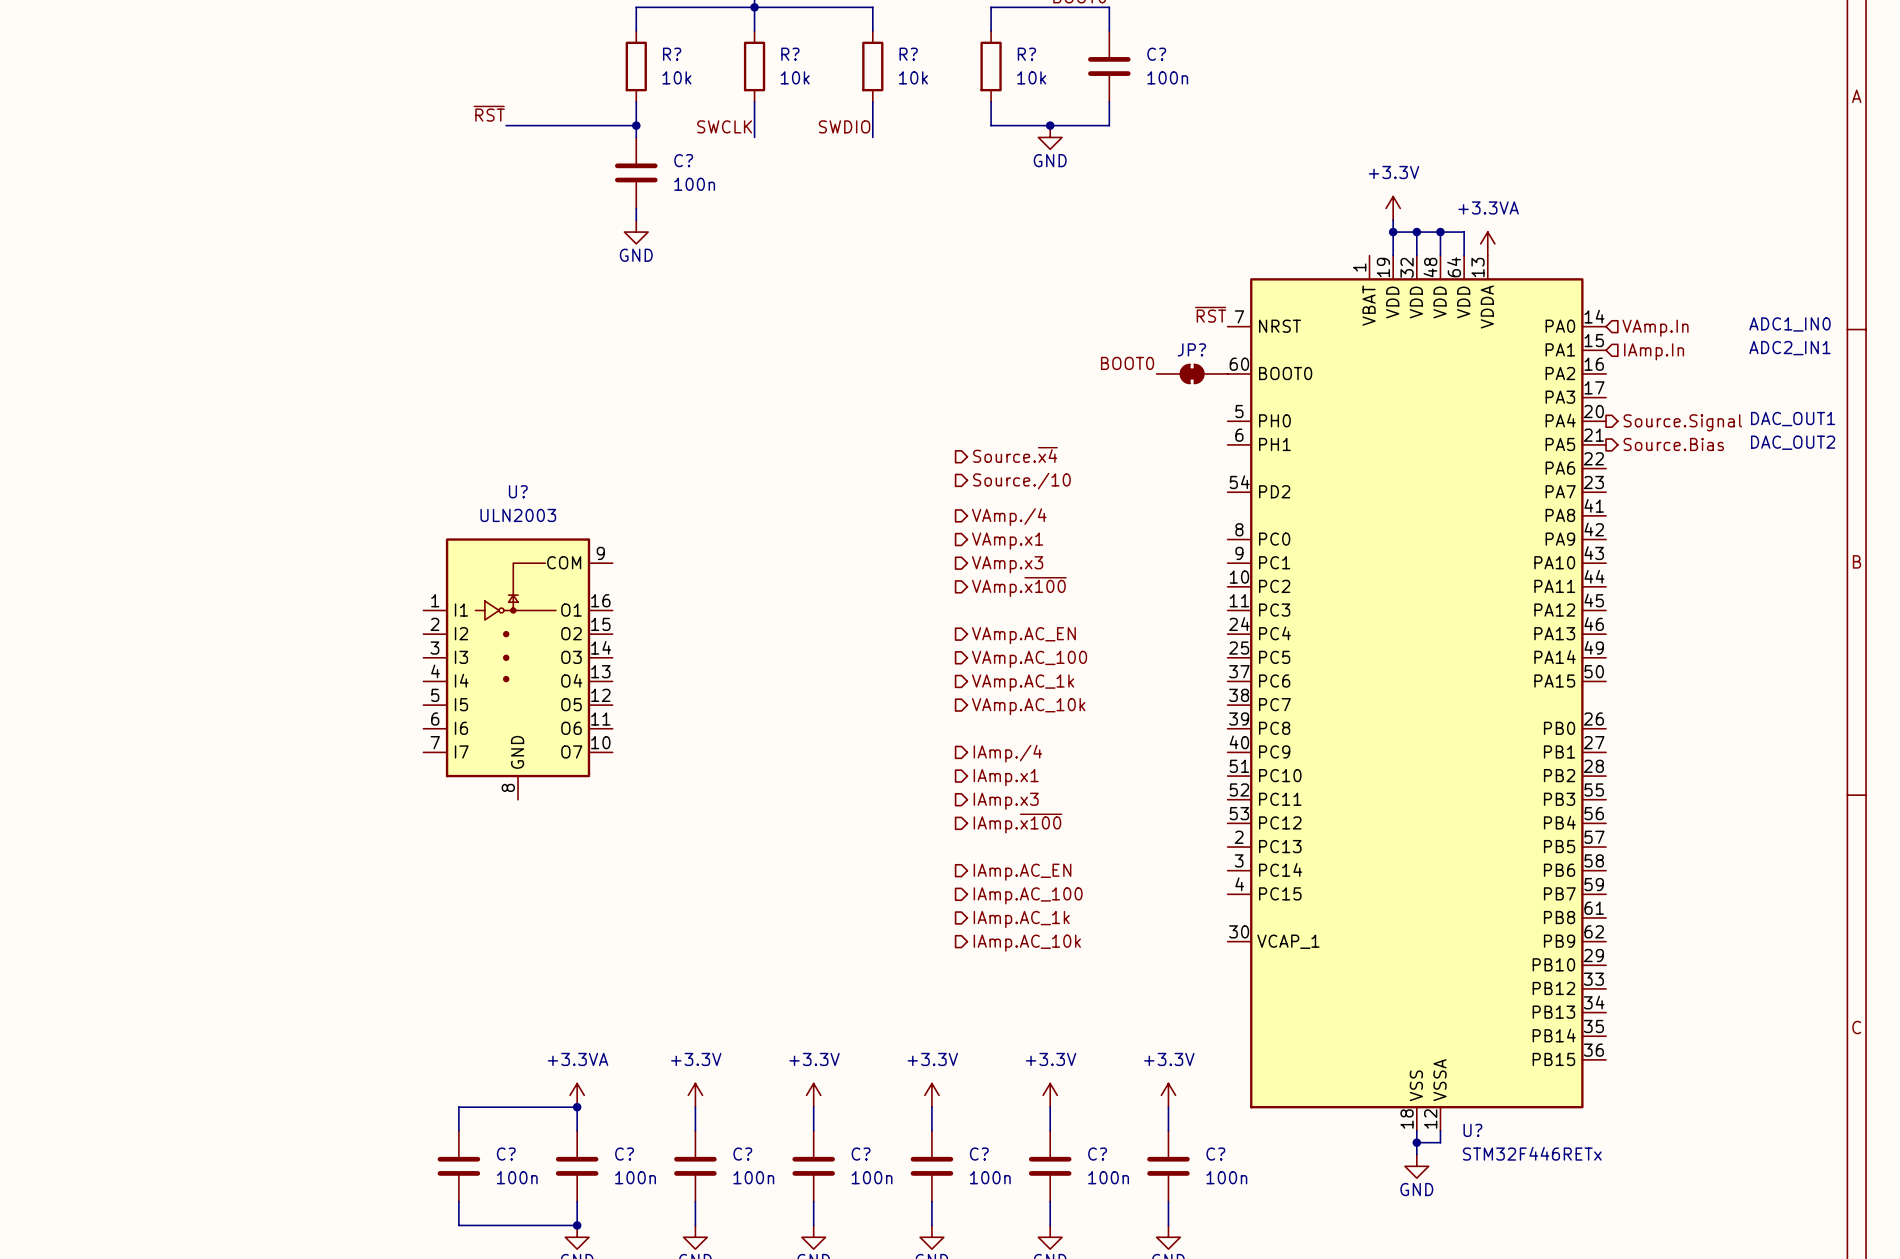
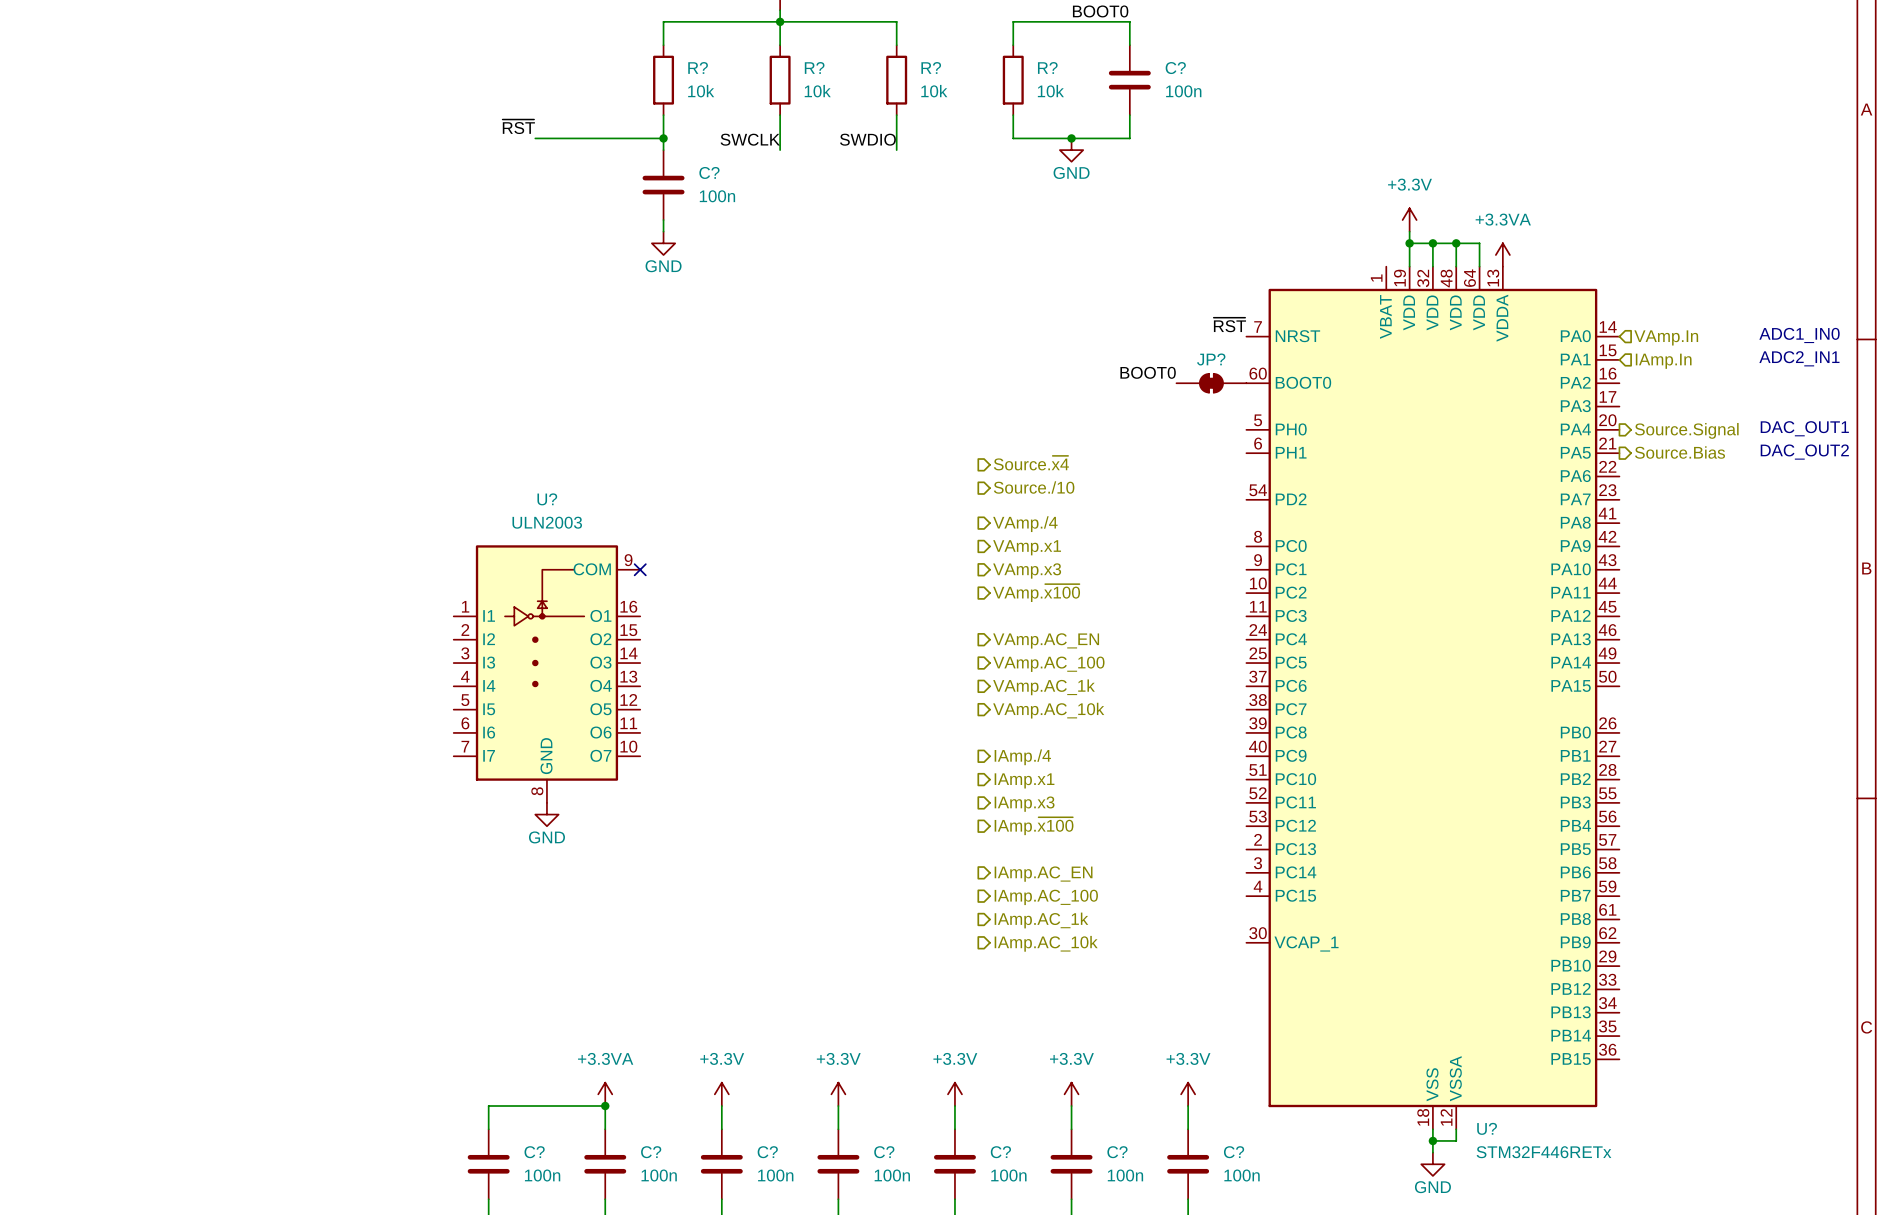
no-connect mark: none -> (640, 569)
power symbol: none -> GND (546, 814)

